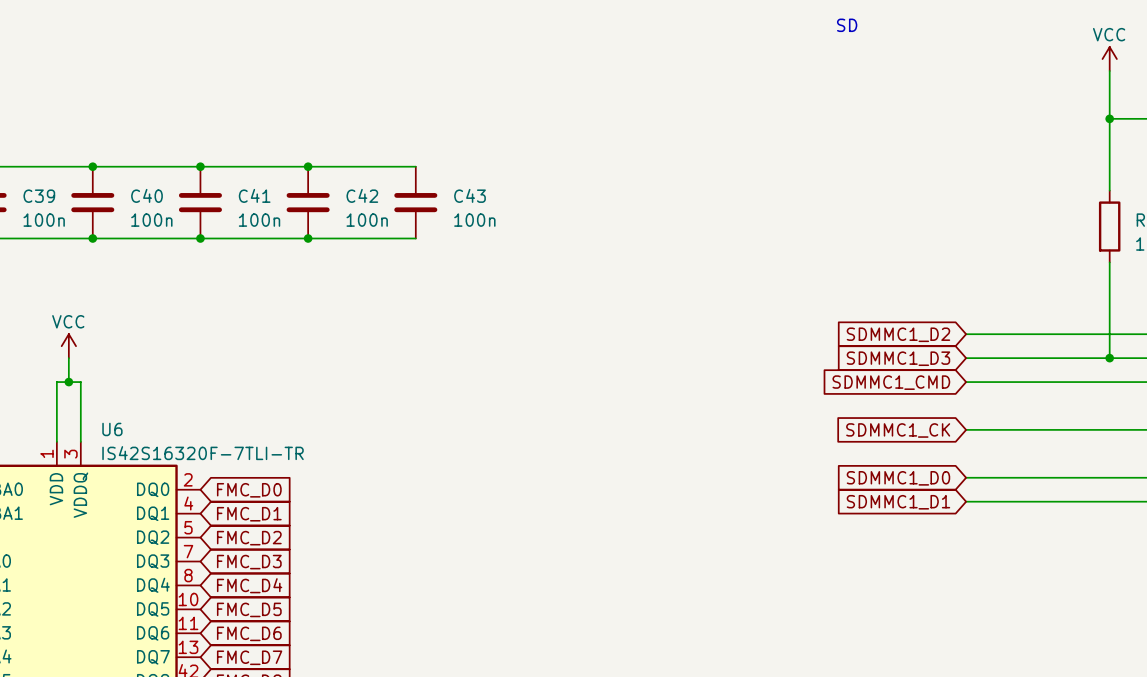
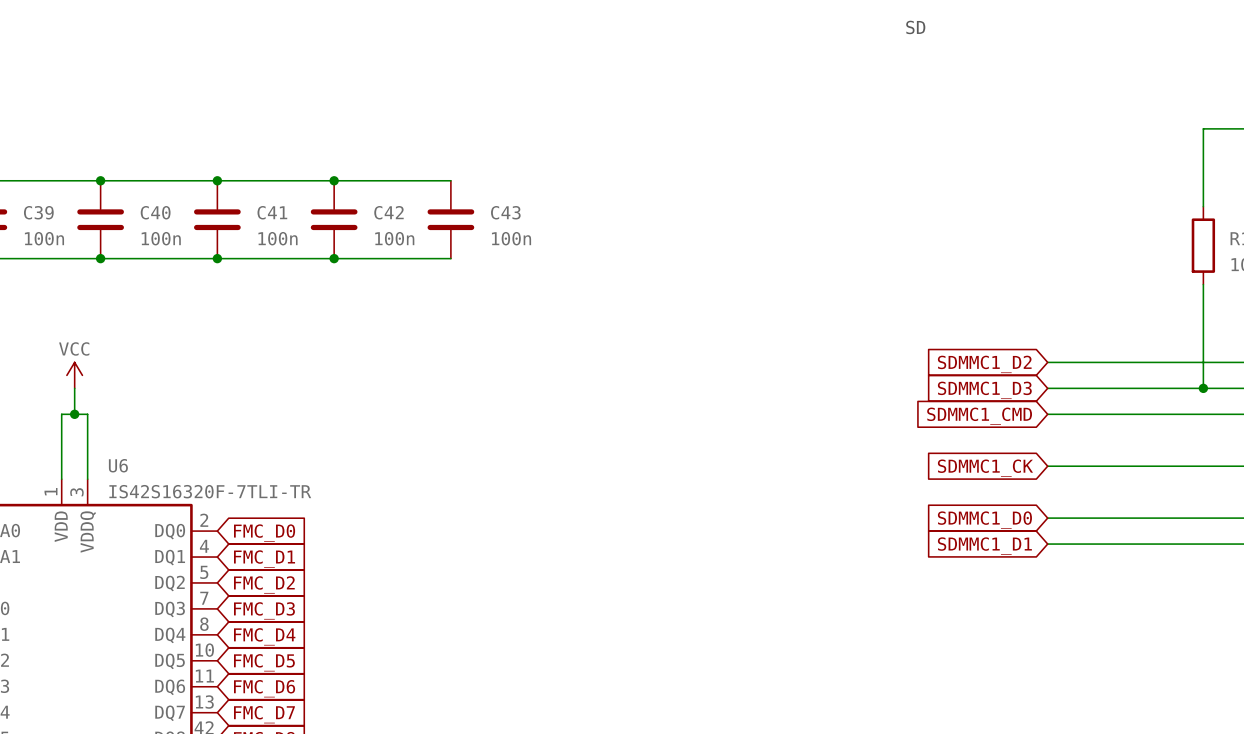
power symbol: VCC (1109, 59) -> none
wire: (1109, 71) (1109, 118) -> none
junction: (1109, 118) -> none

